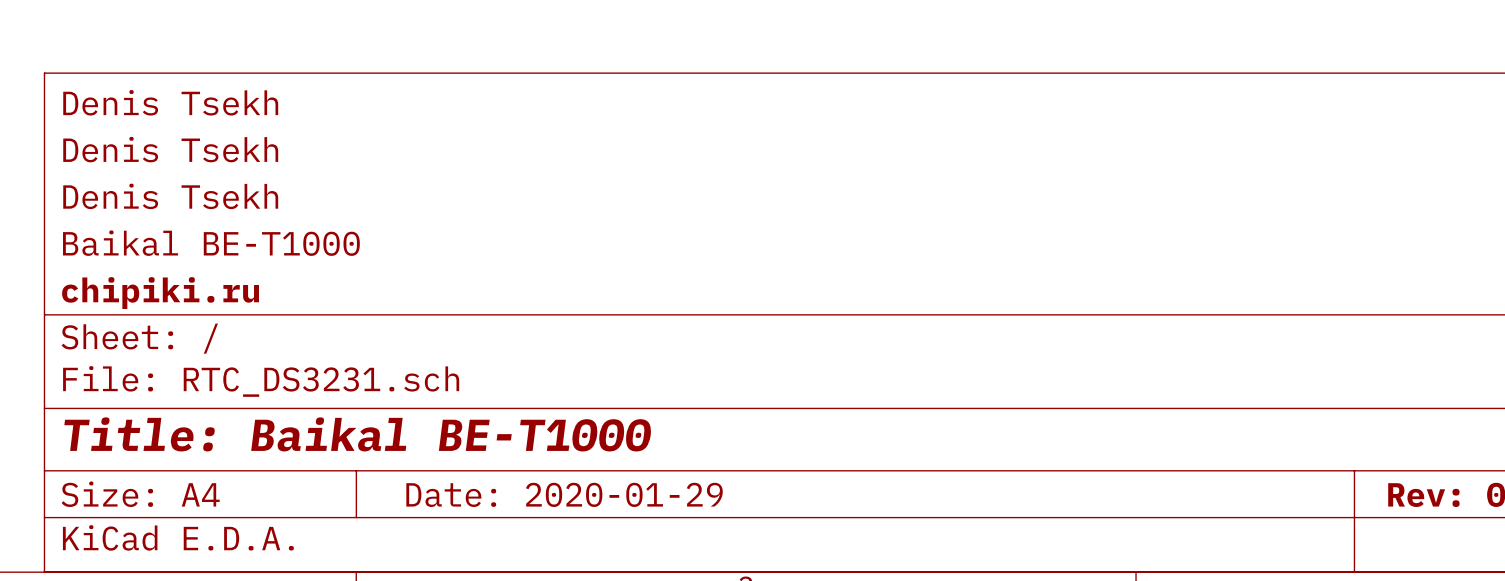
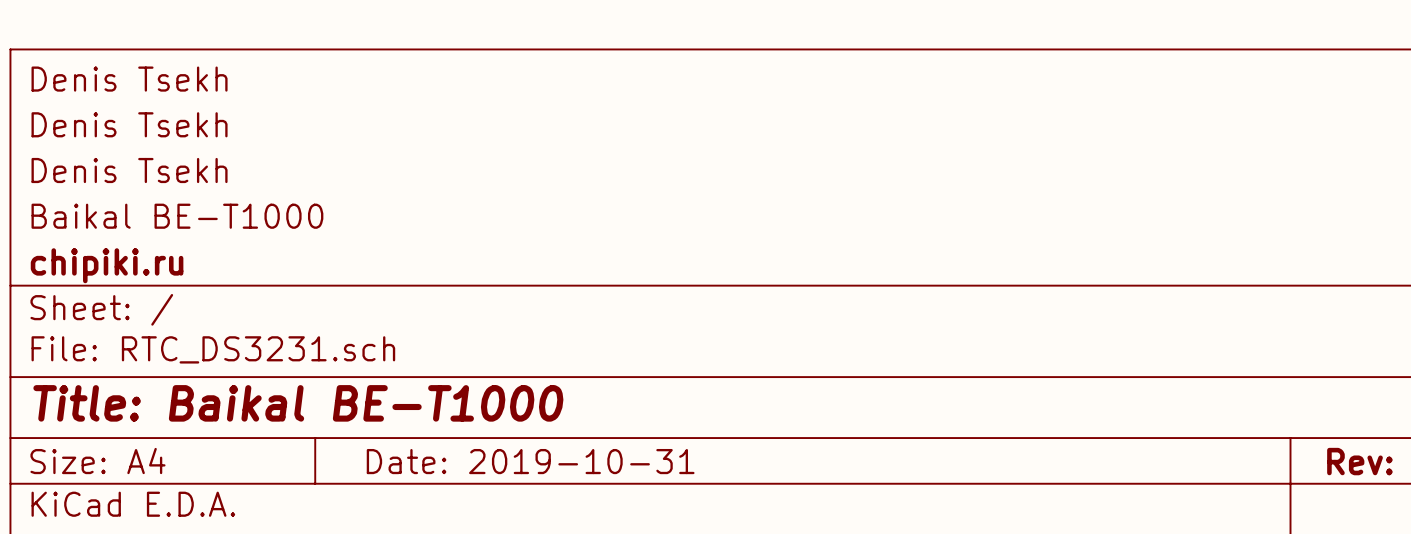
title block: Date: 2020-01-29 (564, 494) -> Date: 2019-10-31 (530, 461)

